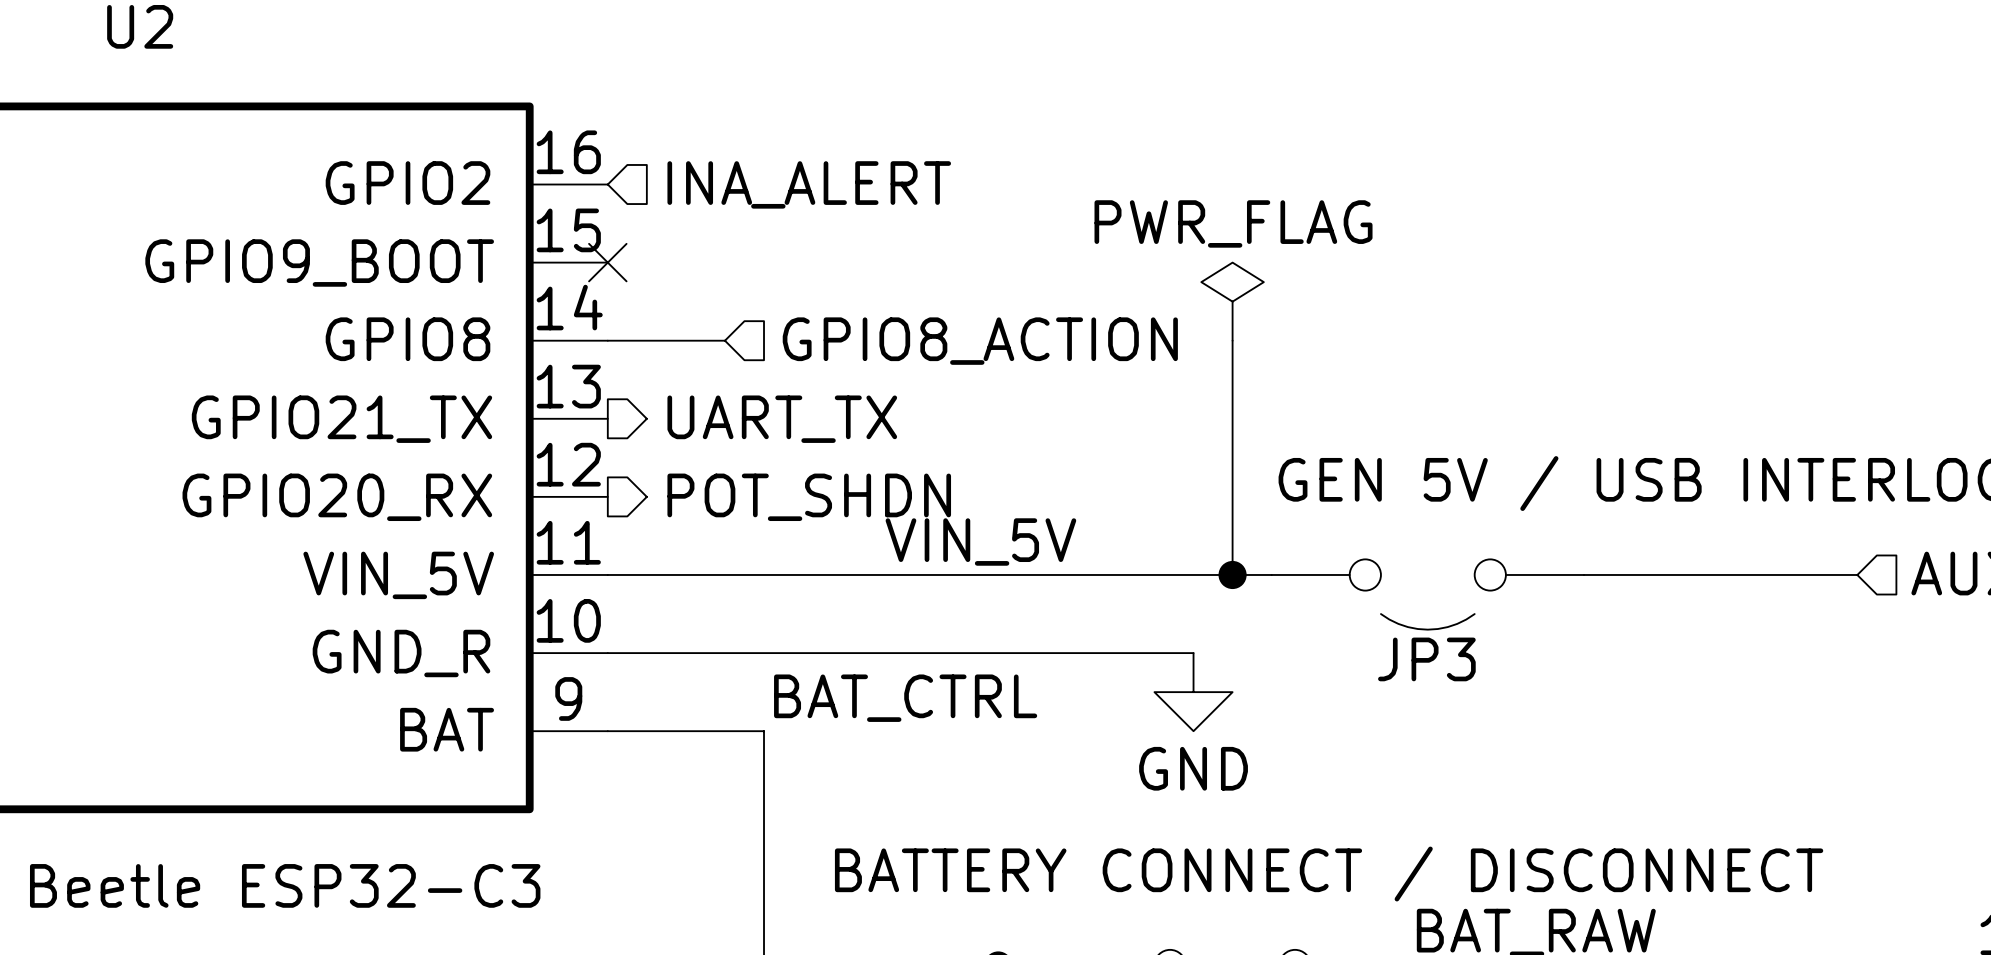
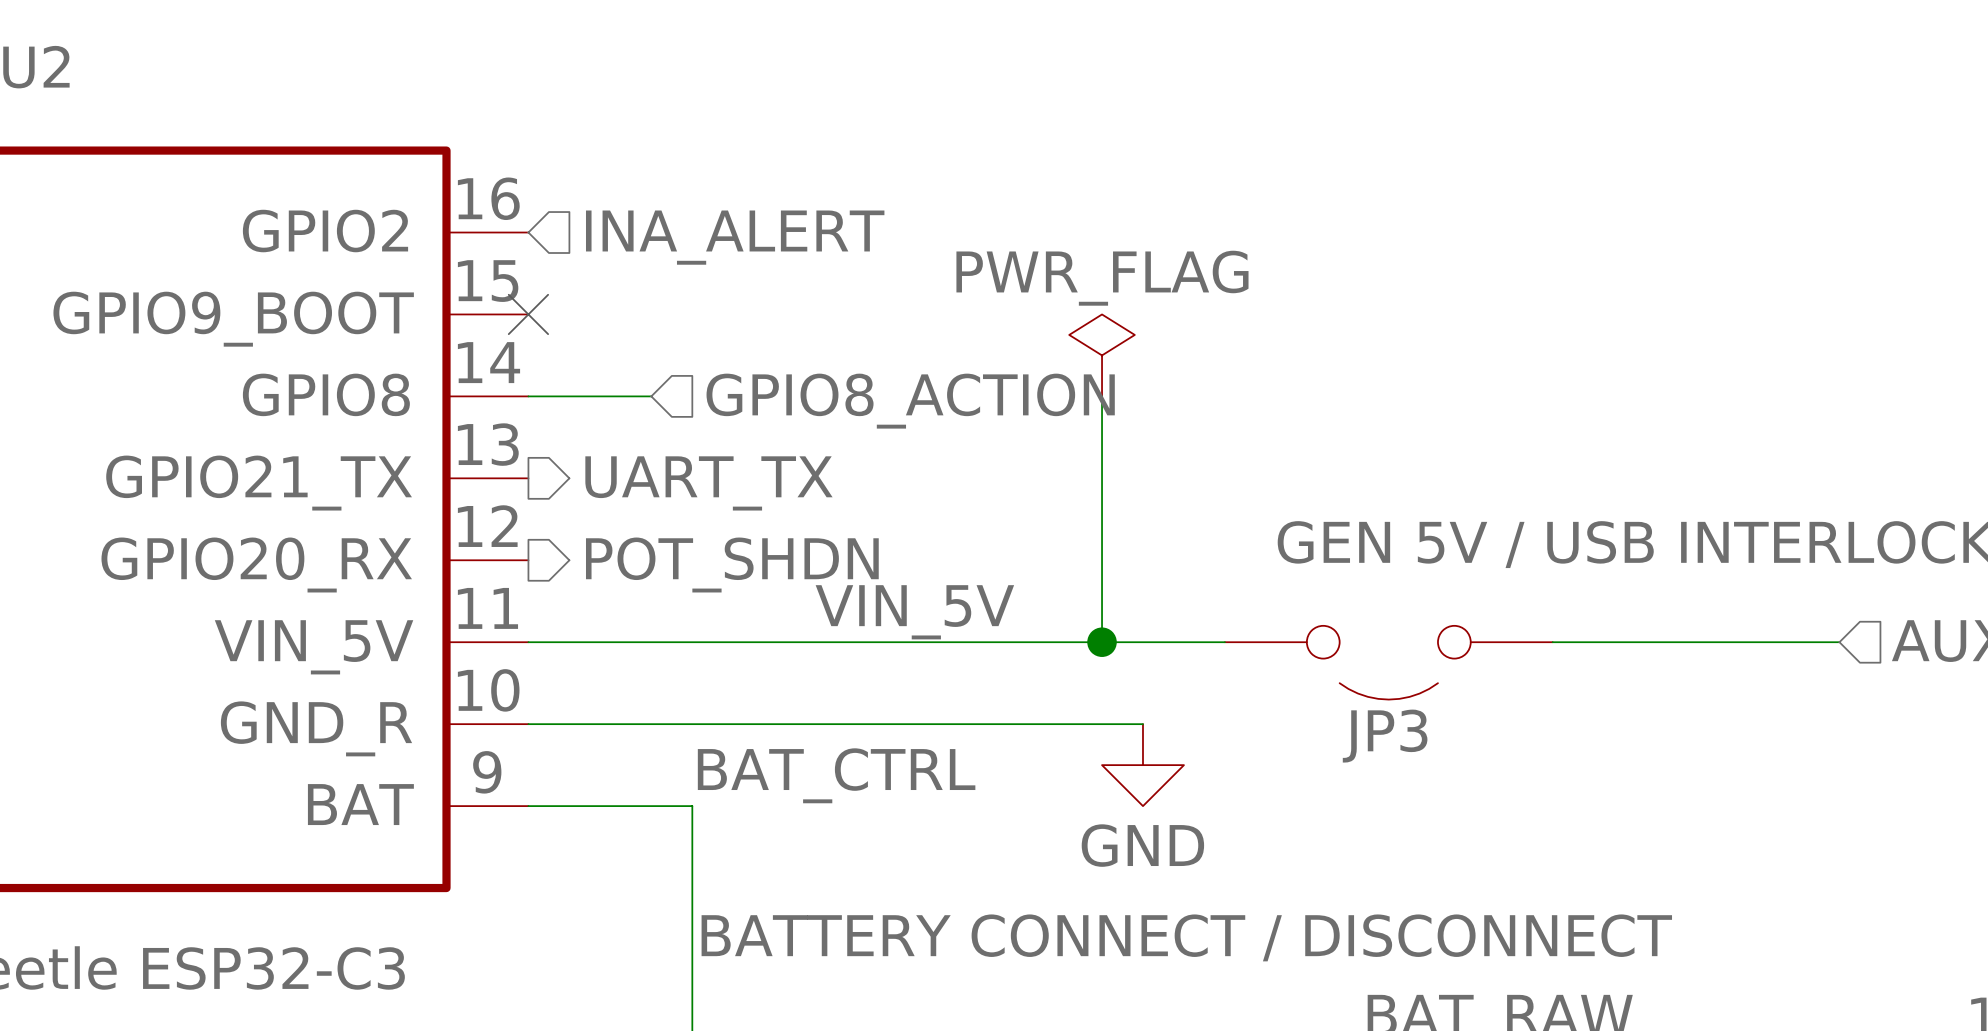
power symbol position: PWR_FLAG (1232, 301) -> PWR_FLAG (1102, 355)
wire: (1232, 340) (1232, 574) -> (1102, 396) (1102, 642)
junction position: (1232, 574) -> (1102, 642)
part value position: BATTERY CONNECT / DISCONNECT (1329, 874) -> BATTERY CONNECT / DISCONNECT (1186, 937)

